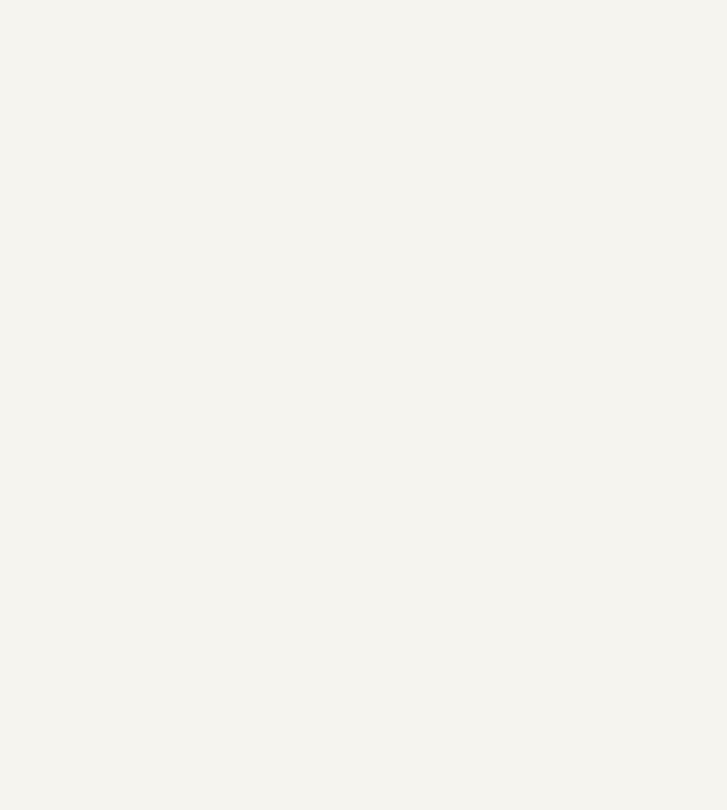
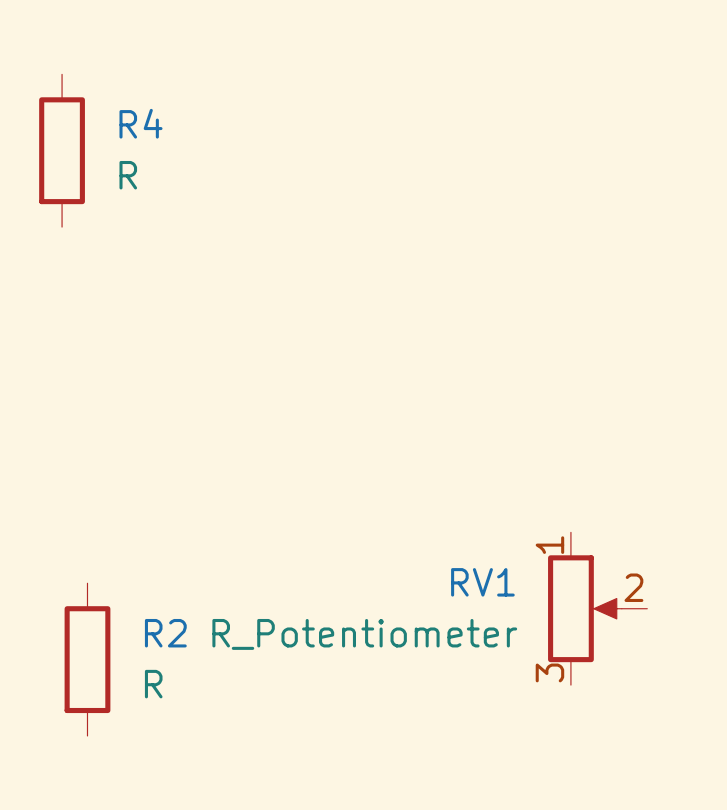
R4: none -> R (62, 150)
RV1: none -> R_Potentiometer (597, 608)
R2: none -> R (87, 659)

